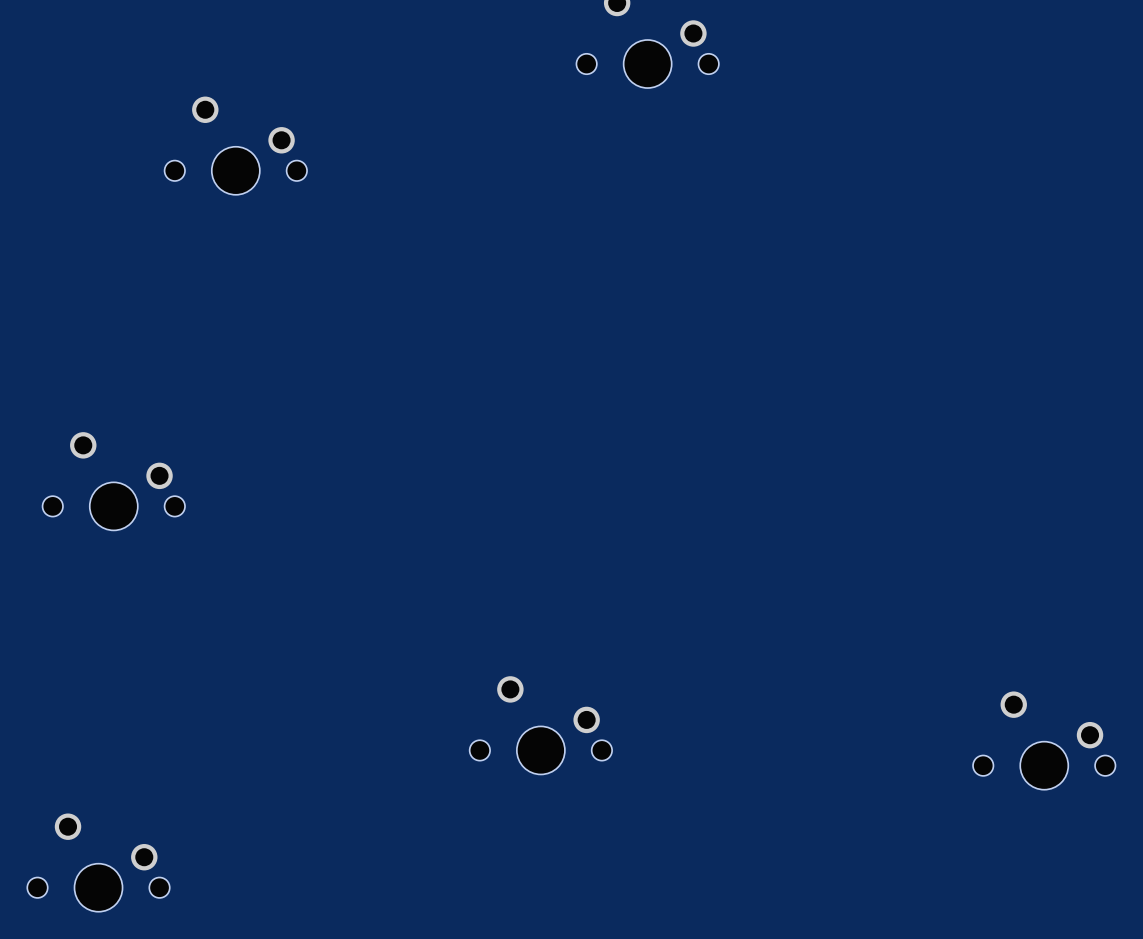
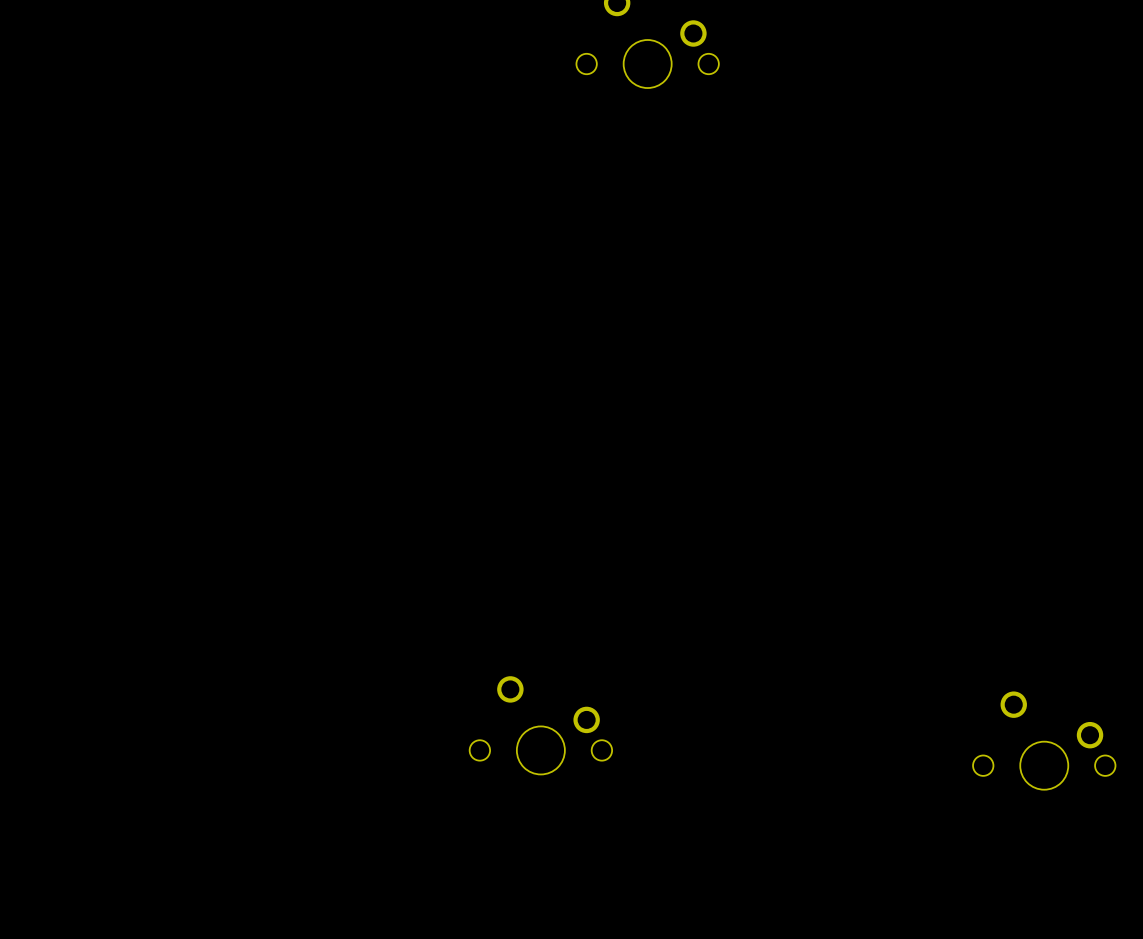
part: (235, 145) -> none
part: (113, 481) -> none
part: (98, 862) -> none

